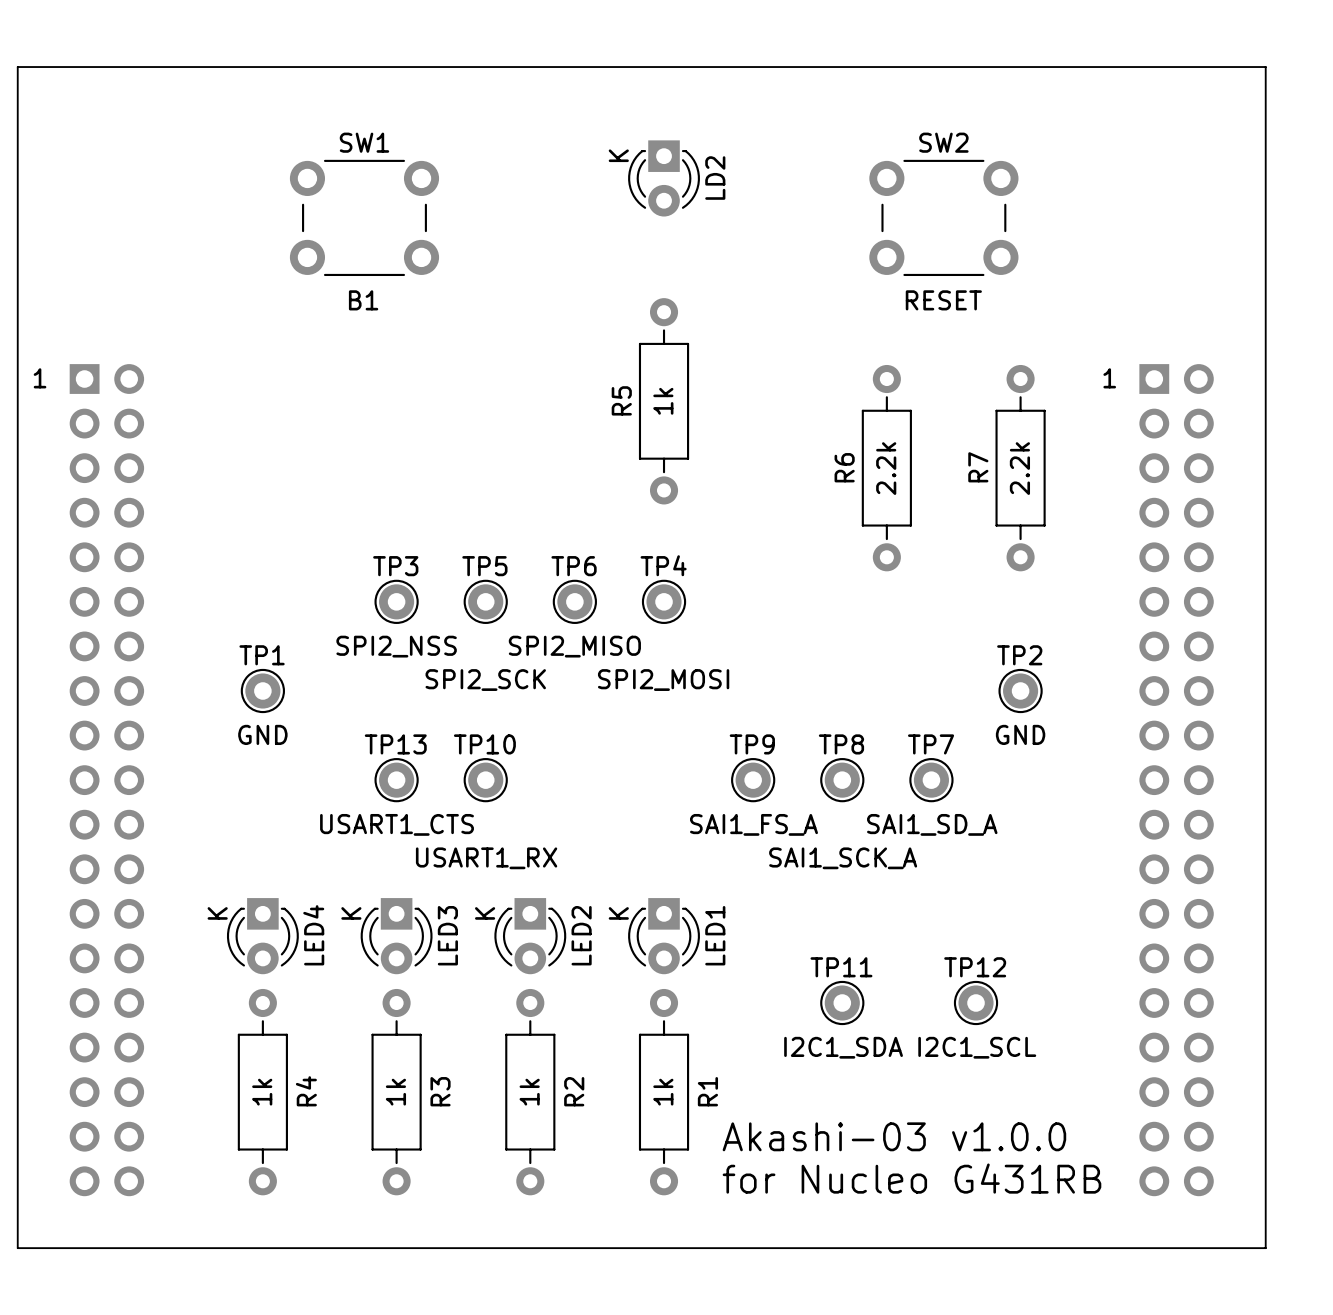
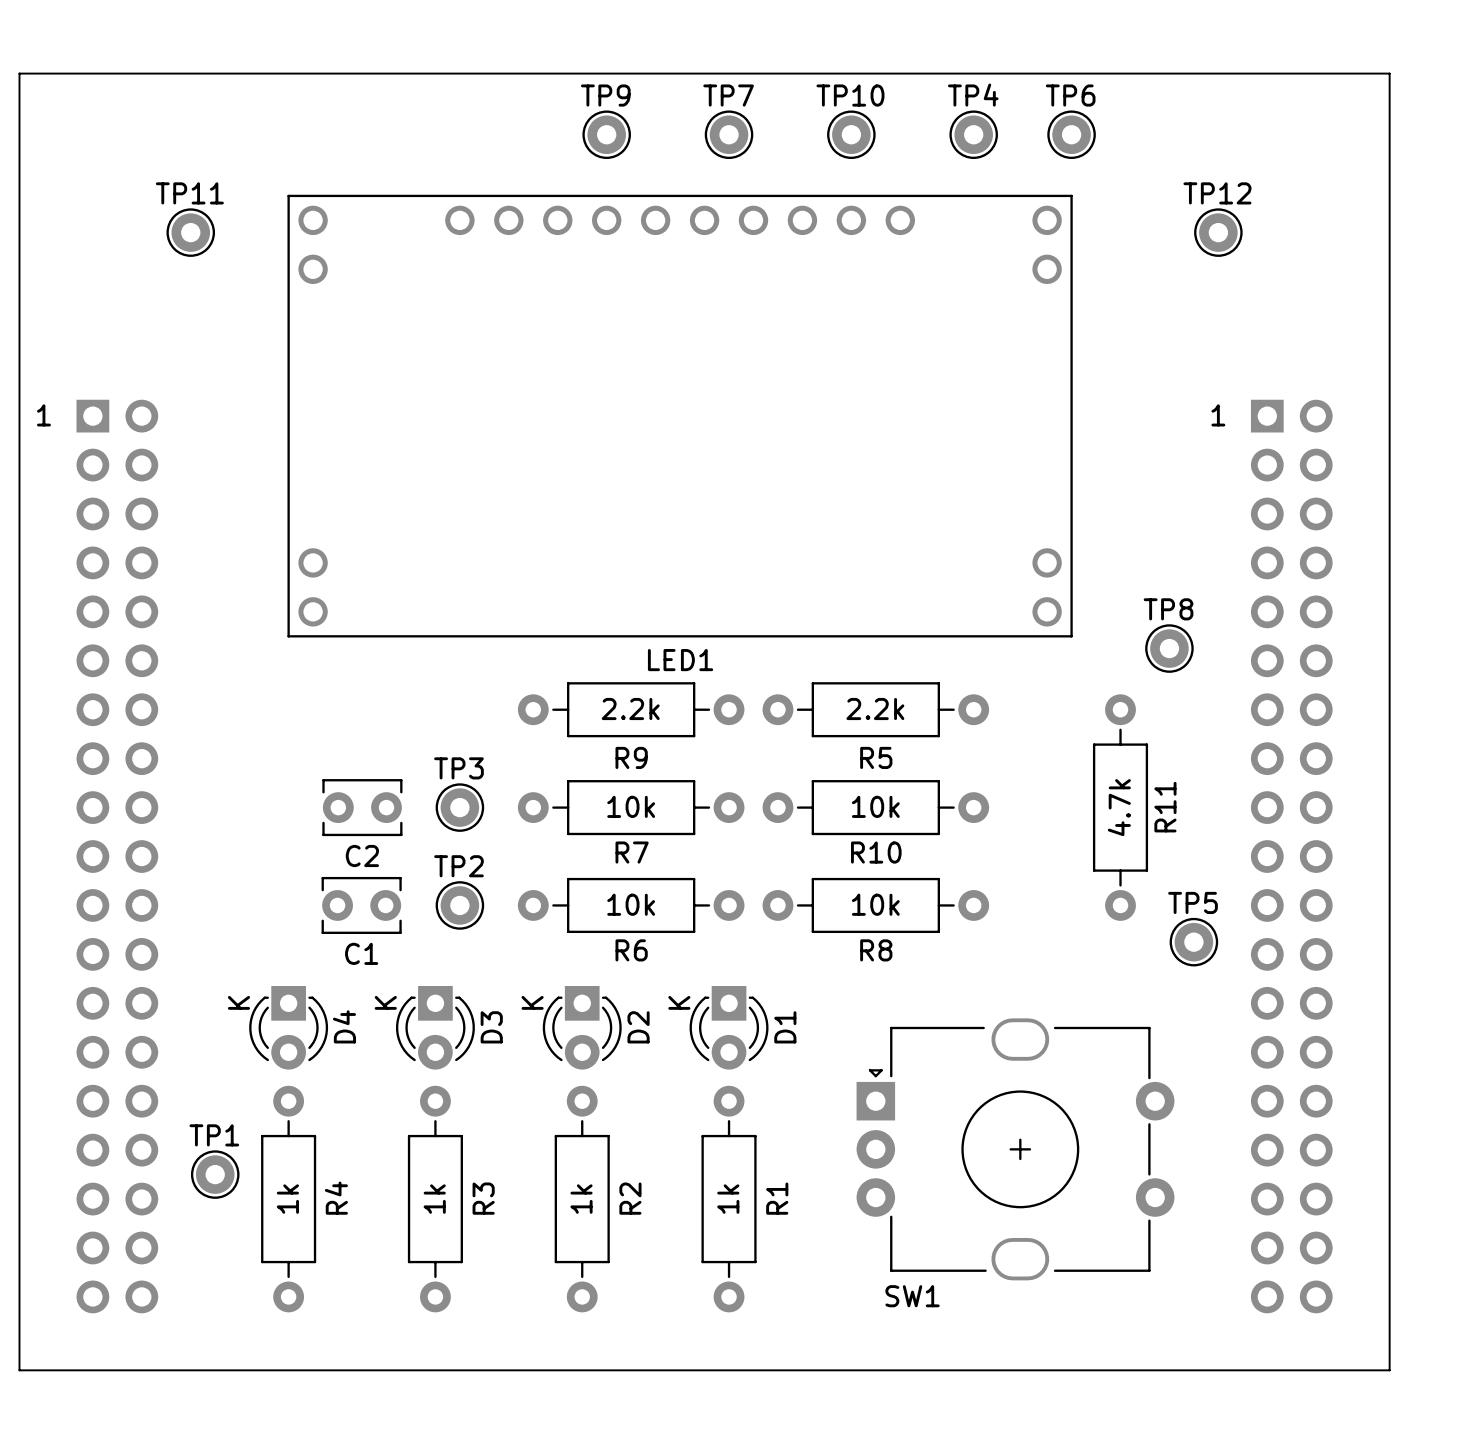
SW1 name position: SW1 (364, 142) -> SW1 (912, 1296)
text: K (618, 155) -> none
SW1 footprint: [289, 159, 440, 277] -> [856, 1018, 1175, 1281]
LD2: (664, 178) -> none
SW2: (943, 217) -> none
text: B1 (363, 300) -> none
text: RESET (943, 300) -> none
LED1: none -> (680, 416)
R5 name position: R5 (621, 400) -> R5 (876, 757)
R5 value: 1k (663, 401) -> 2.2k (875, 709)
R5 rotation: 0° (664, 401) -> 90° clockwise (875, 709)
R5 position: (664, 401) -> (875, 709)
R6 name position: R6 (844, 467) -> R6 (631, 950)
R7 name position: R7 (978, 467) -> R7 (632, 852)
R6 rotation: 0° (886, 468) -> 90° clockwise (631, 905)
R6 position: (886, 468) -> (631, 905)
R6 value: 2.2k (886, 468) -> 10k (631, 904)
R7 value: 2.2k (1019, 468) -> 10k (631, 806)
R7 rotation: 0° (1020, 468) -> 90° clockwise (631, 807)
R7 position: (1020, 468) -> (631, 807)
TP3 position: (396, 601) -> (459, 807)
TP5 position: (485, 601) -> (1193, 942)
TP6 position: (574, 601) -> (1071, 134)
TP4 position: (664, 601) -> (973, 134)
text: SPI2_NSS (396, 646) -> none
R9: none -> 2.2k (631, 709)
text: SPI2_MISO (574, 646) -> none
text: SPI2_SCK (485, 680) -> none
text: SPI2_MOSI (663, 680) -> none
TP1 position: (262, 691) -> (215, 1174)
TP2 position: (1020, 691) -> (459, 905)
text: GND (262, 734) -> none
text: GND (1020, 734) -> none
C2: none -> (362, 807)
R10: none -> 10k (875, 807)
R11: none -> 4.7k (1120, 807)
TP13: (396, 780) -> none
TP10 position: (485, 780) -> (851, 134)
TP9 position: (753, 780) -> (606, 134)
TP8 position: (842, 780) -> (1169, 648)
TP7 position: (931, 780) -> (729, 134)
C1: none -> (361, 905)
text: USART1_CTS (397, 824) -> none
text: SAI1_FS_A (753, 824) -> none
R8: none -> 10k (875, 905)
text: SAI1_SD_A (932, 824) -> none
text: USART1_RX (486, 858) -> none
text: SAI1_SCK_A (843, 858) -> none
LED4 name: LED4 (313, 935) -> D4 (344, 1026)
LED3 name: LED3 (447, 935) -> D3 (491, 1027)
LED2 name: LED2 (581, 935) -> D2 (638, 1027)
LED1 name: LED1 (715, 935) -> D1 (785, 1027)
TP11 position: (842, 1002) -> (190, 232)
TP12 position: (976, 1002) -> (1218, 232)
text: I2C1_SDA (843, 1047) -> none
text: I2C1_SCL (977, 1047) -> none
text: Akashi-03 v1.0.0 (894, 1136) -> none
text: for Nucleo G431RB (911, 1178) -> none

